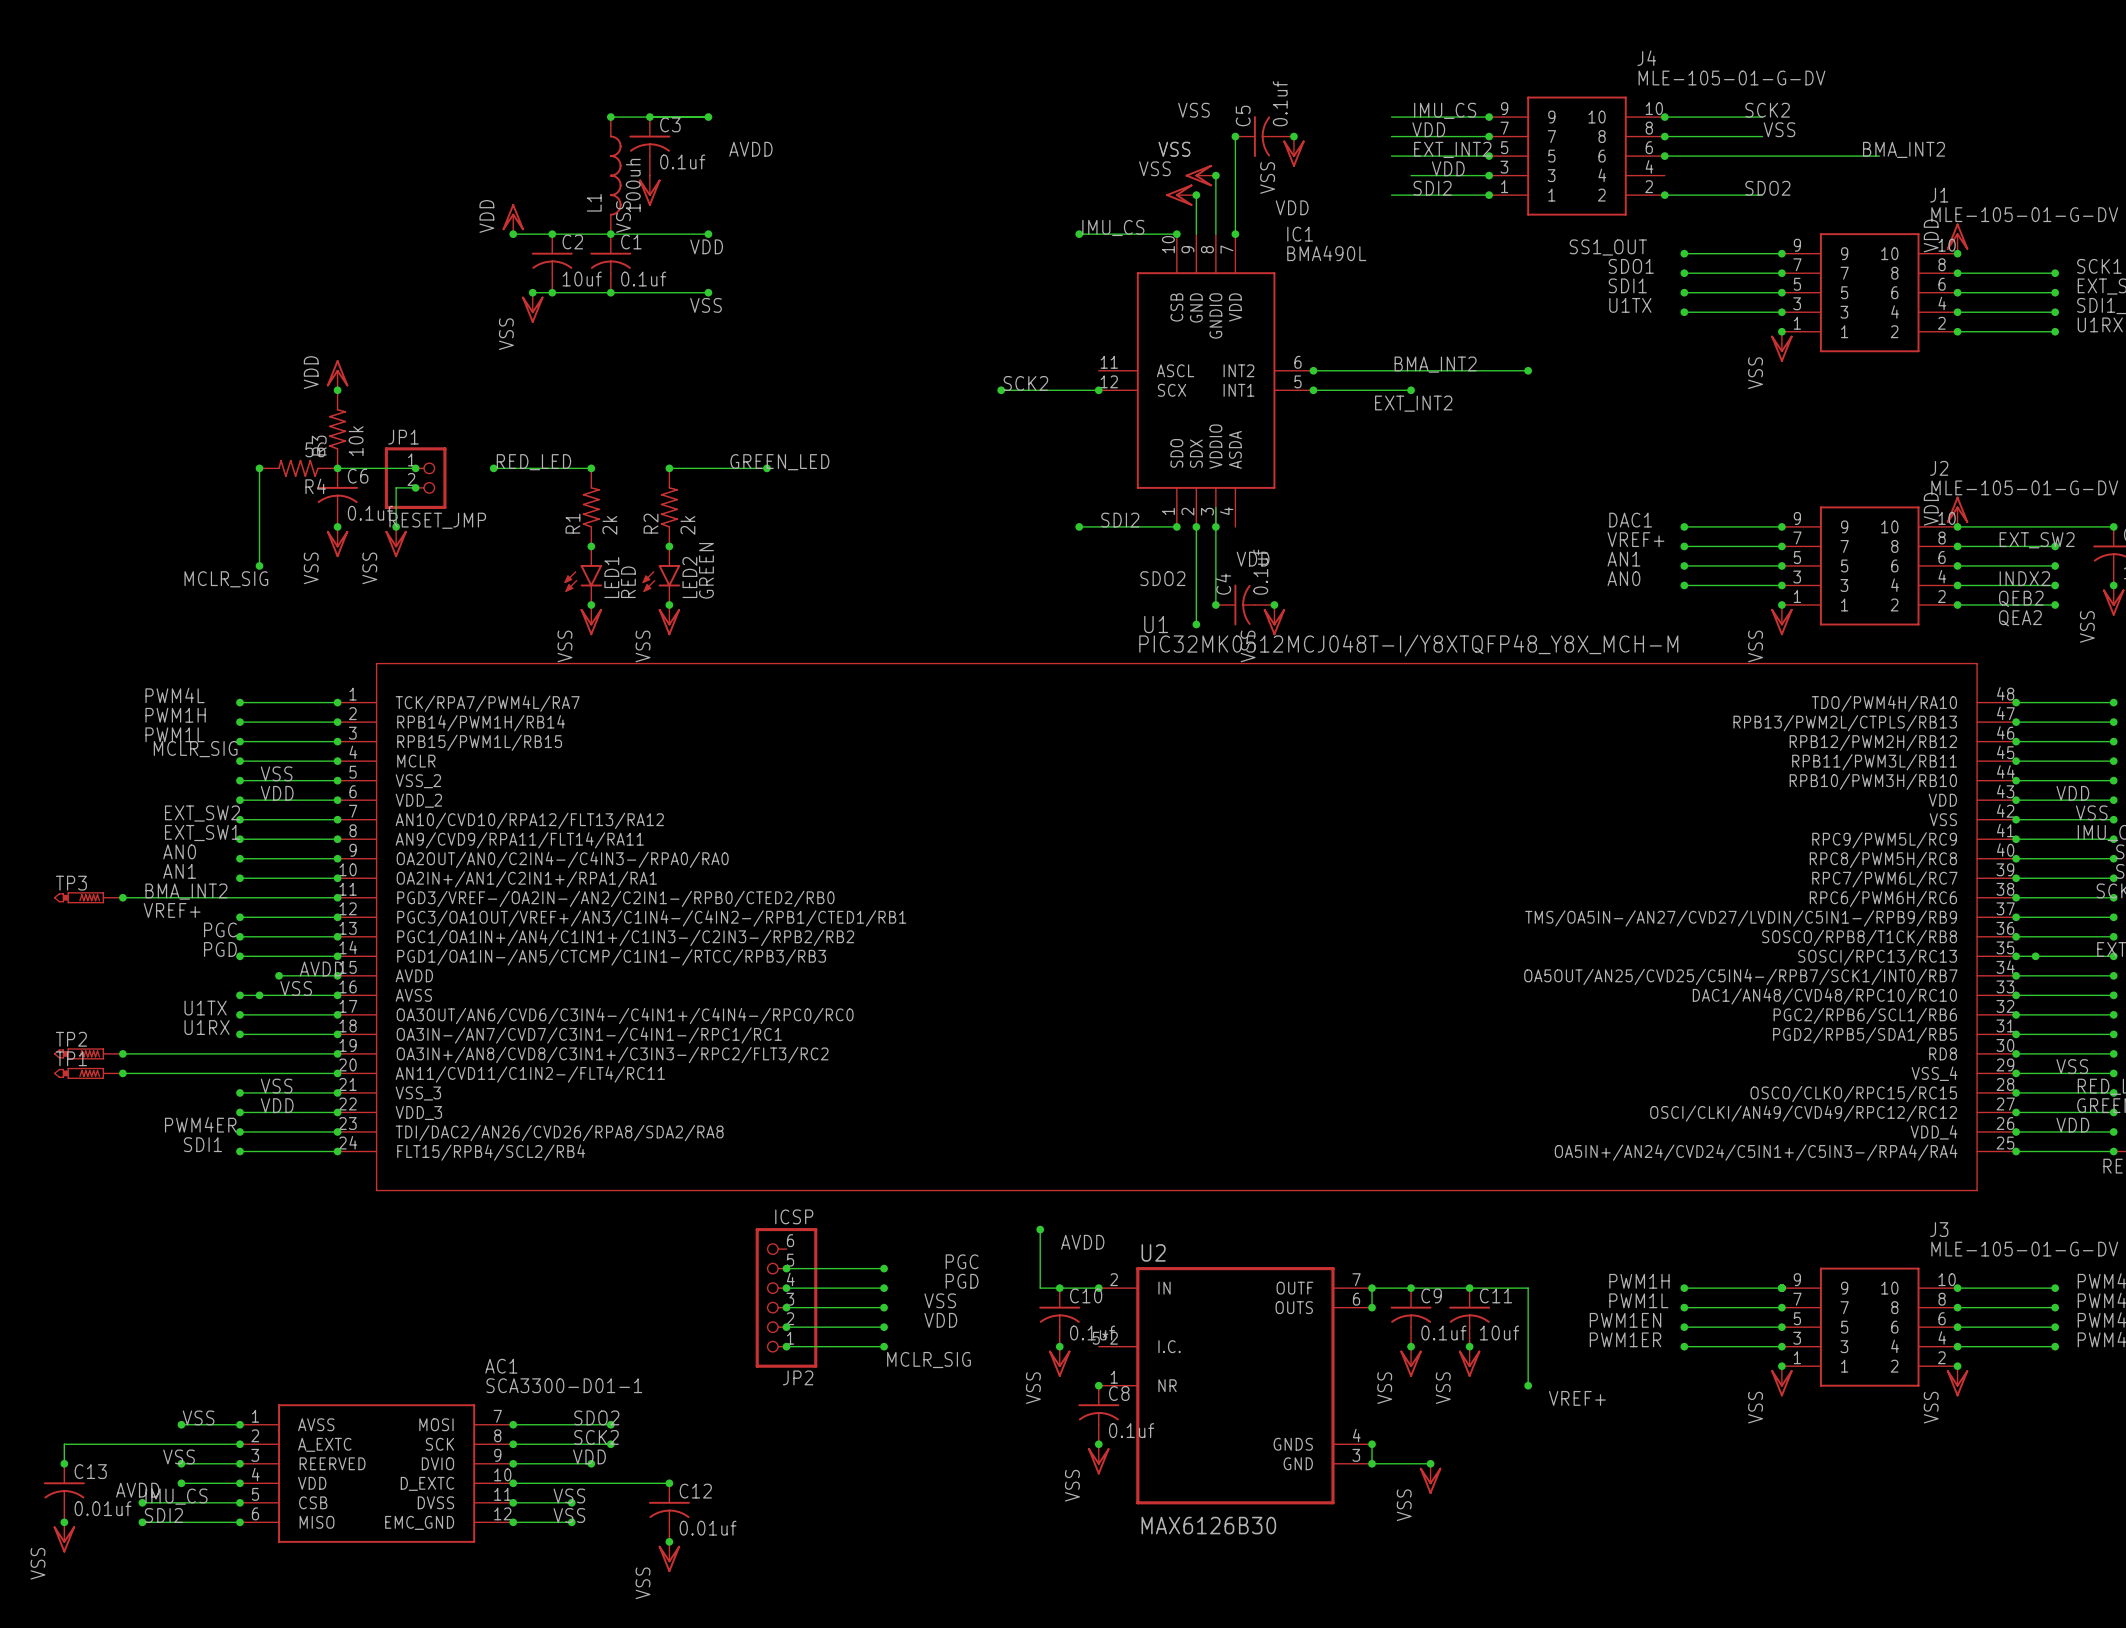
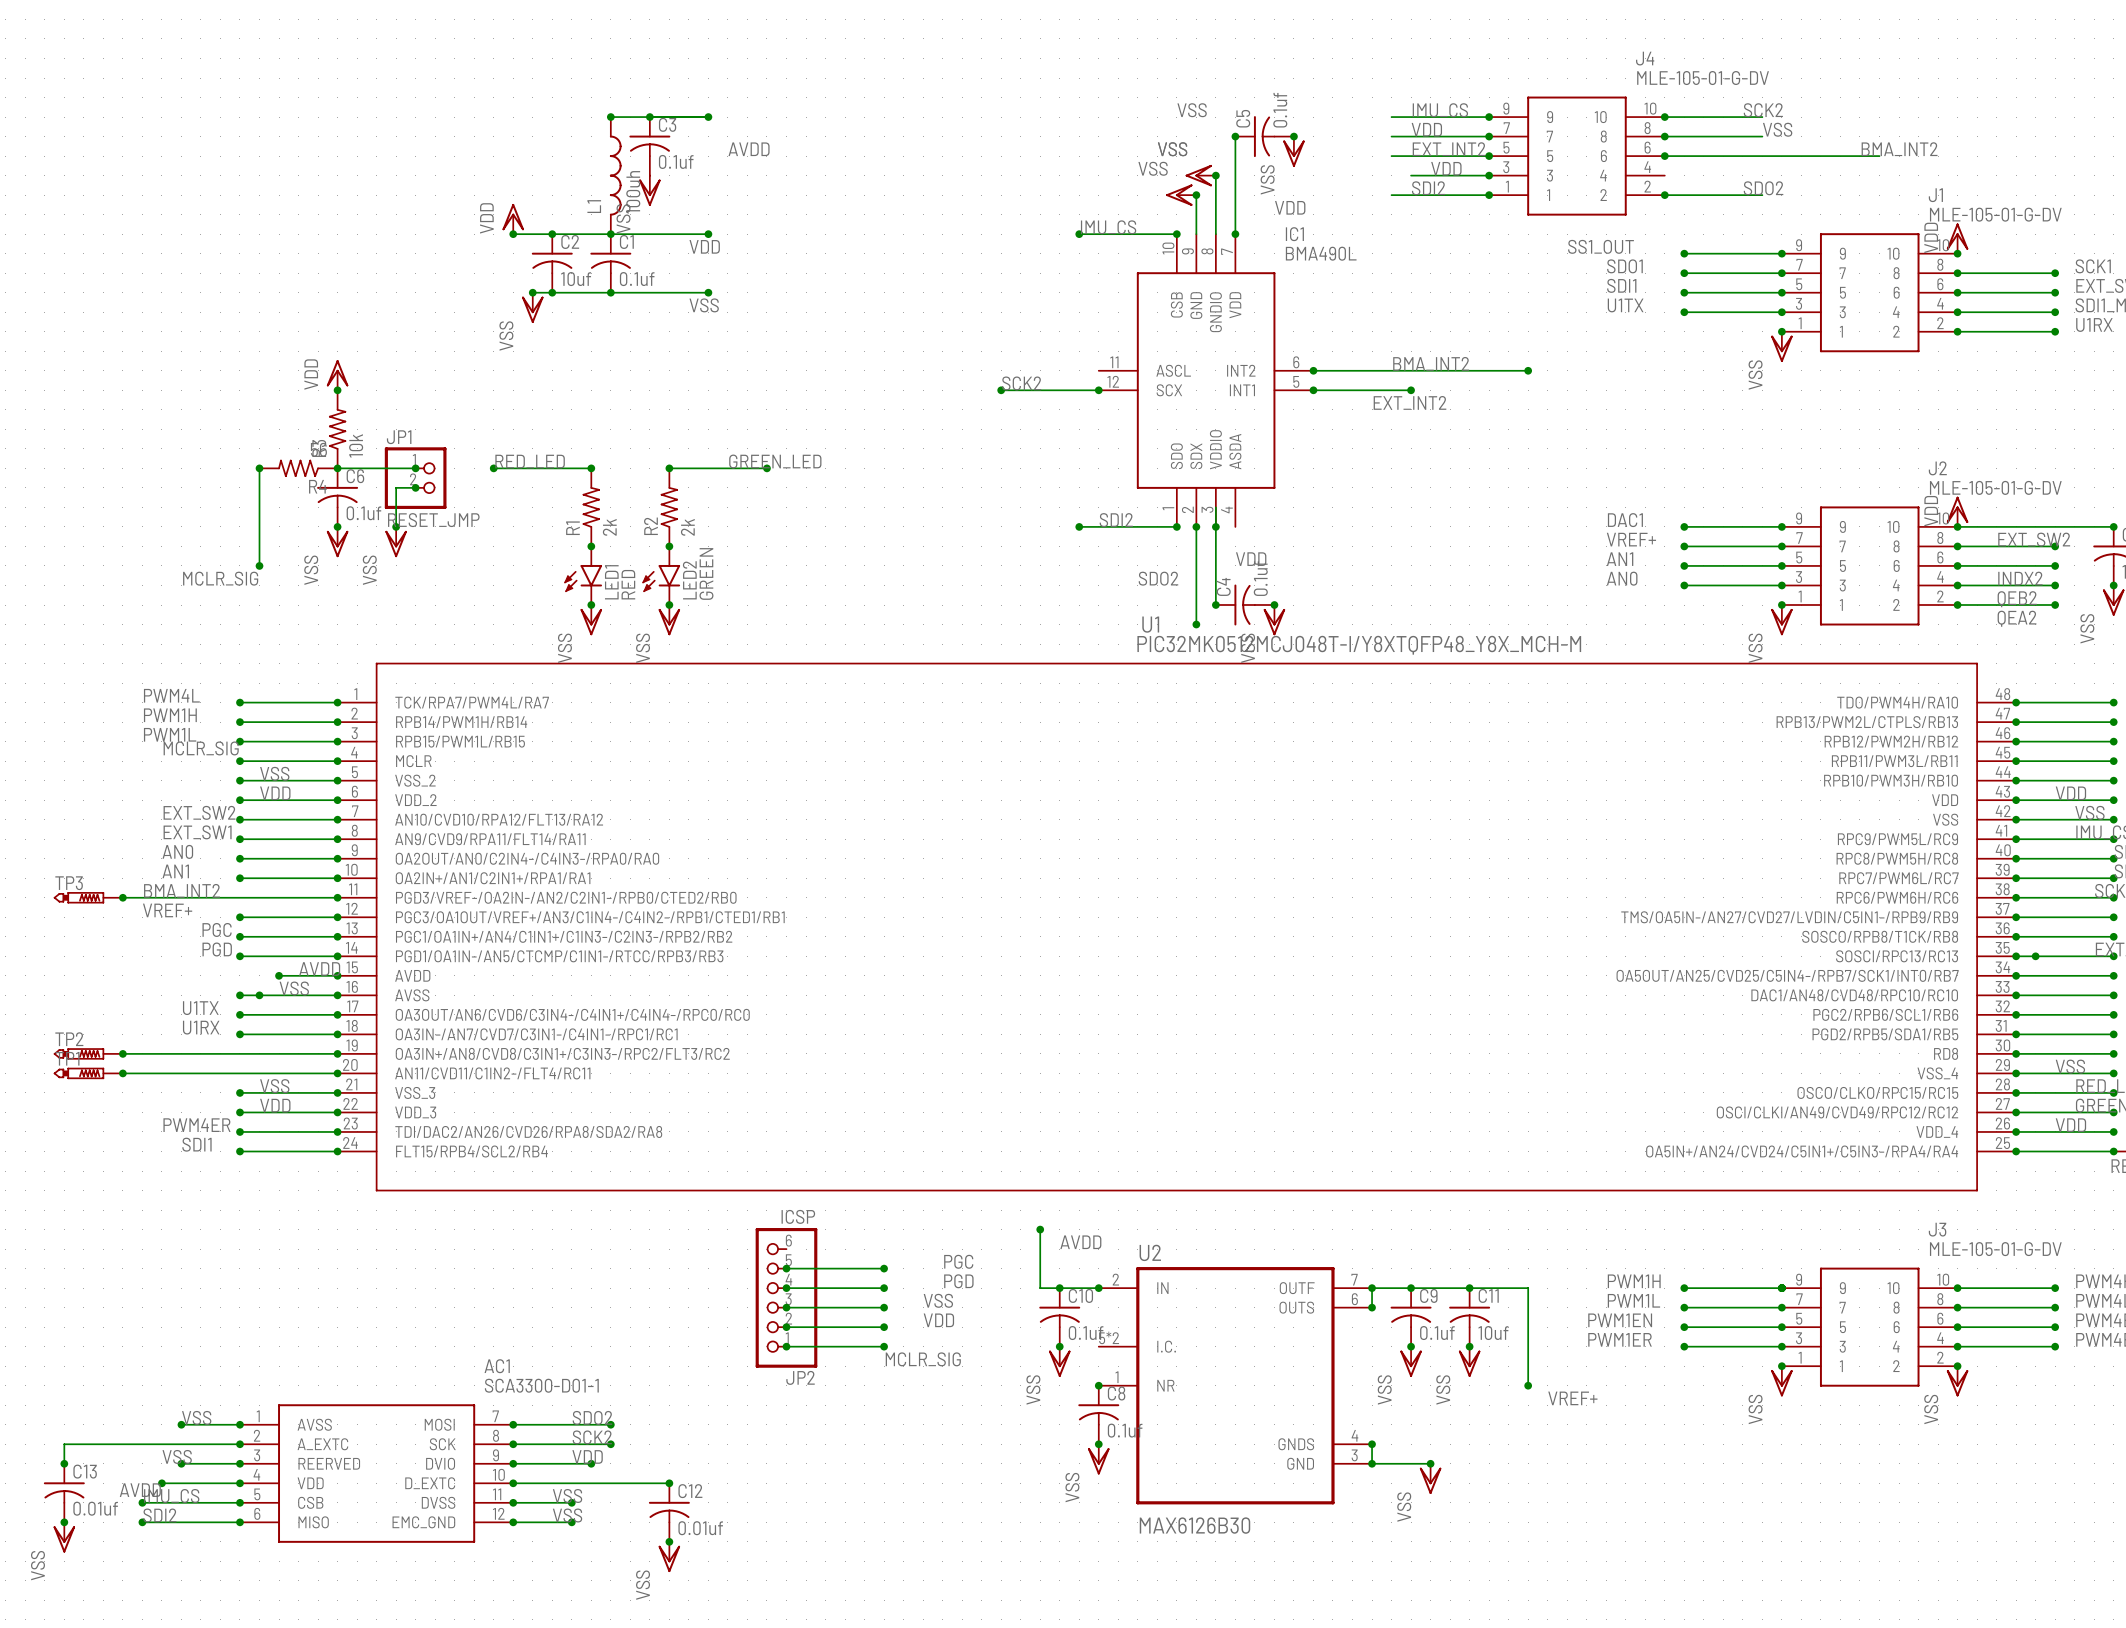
wire: none -> (161, 1483) (181, 1483)
junction position: (181, 1483) -> (161, 1483)

